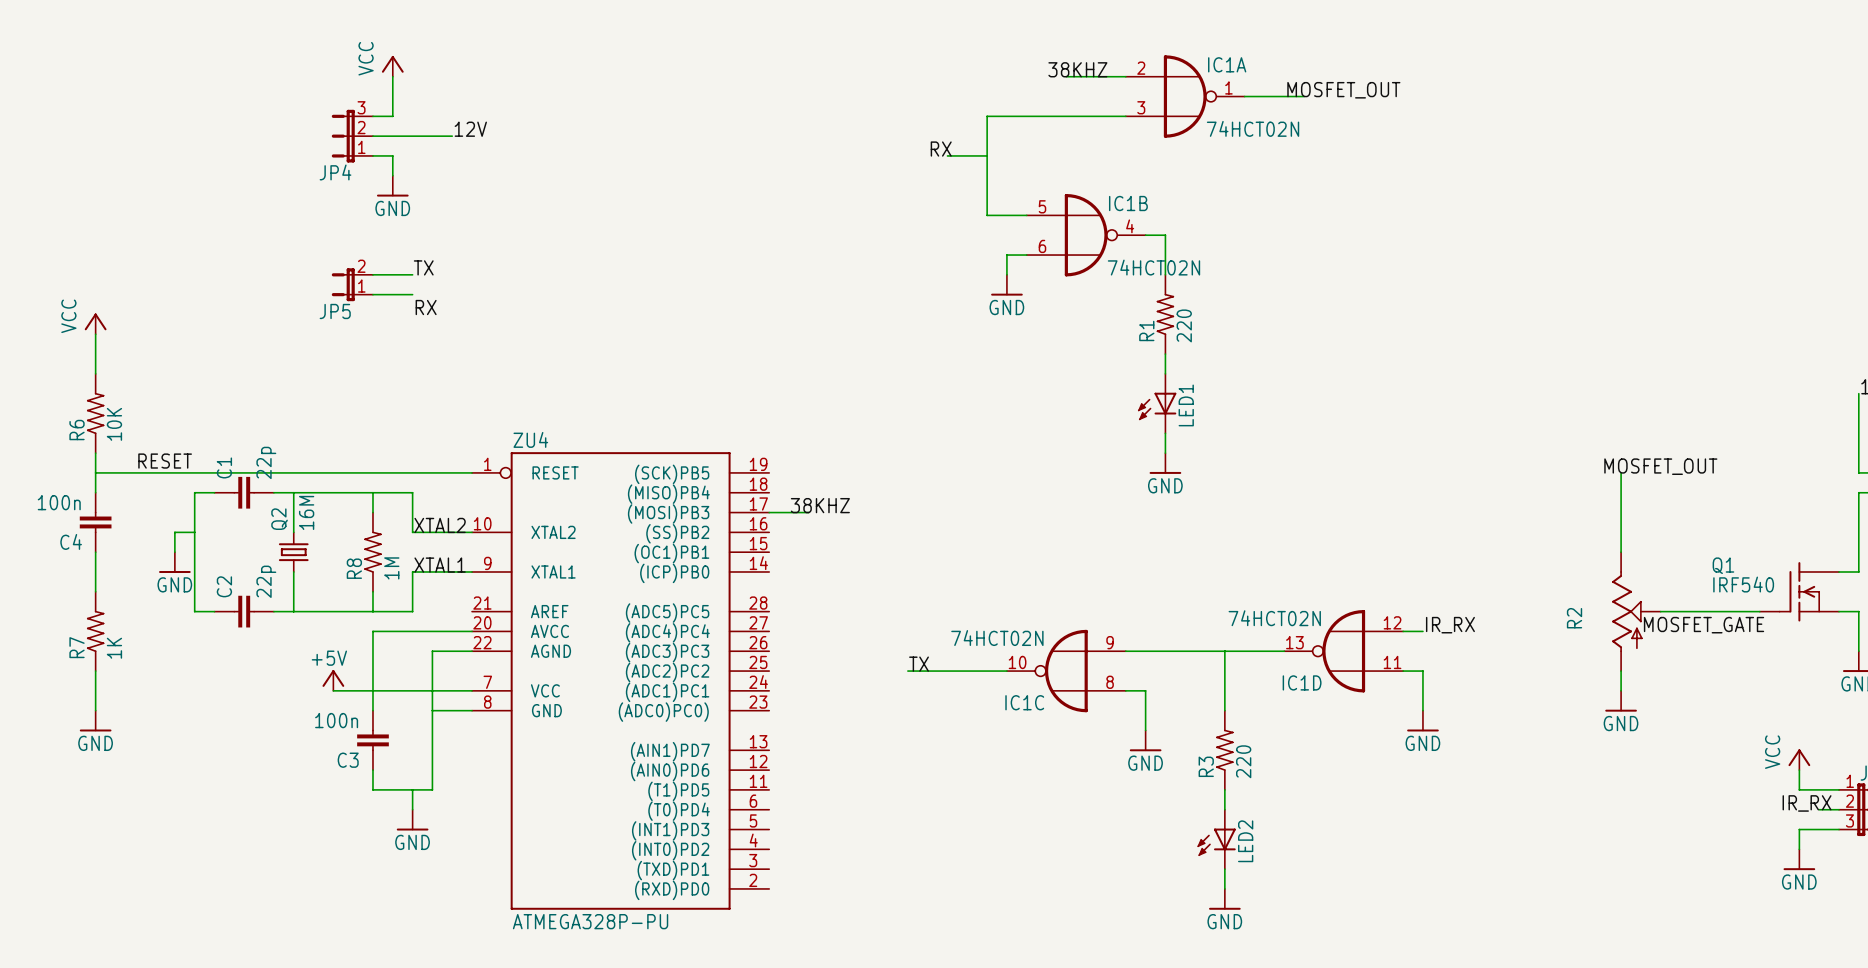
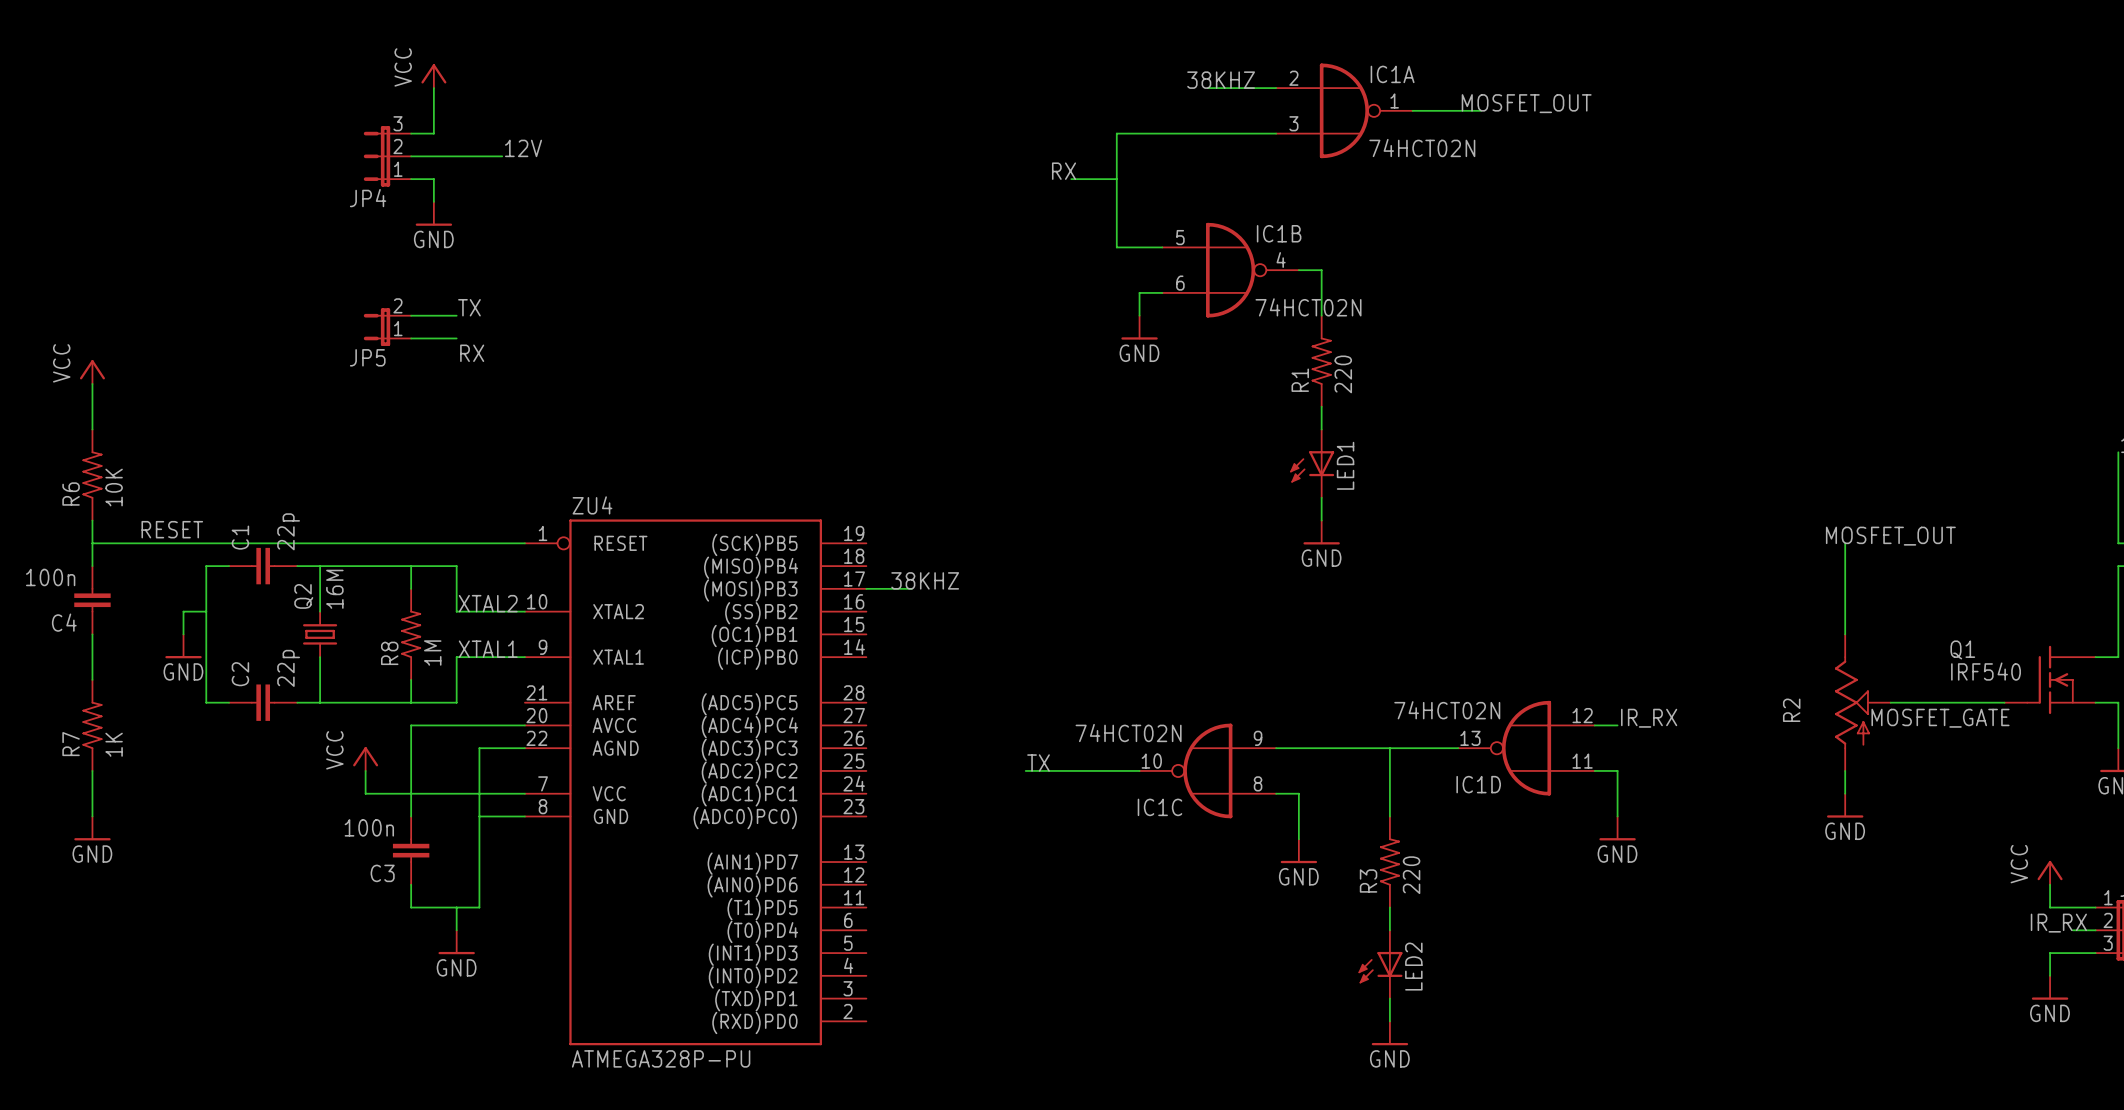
power symbol: none -> VCC (365, 759)
power symbol: +5V (333, 680) -> none

